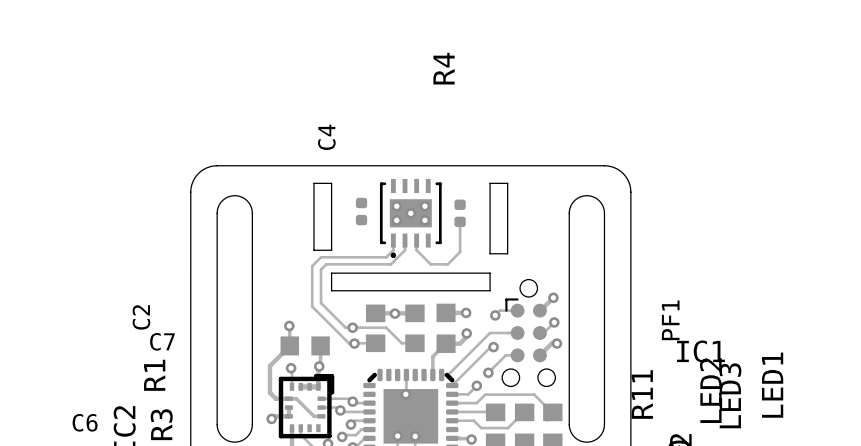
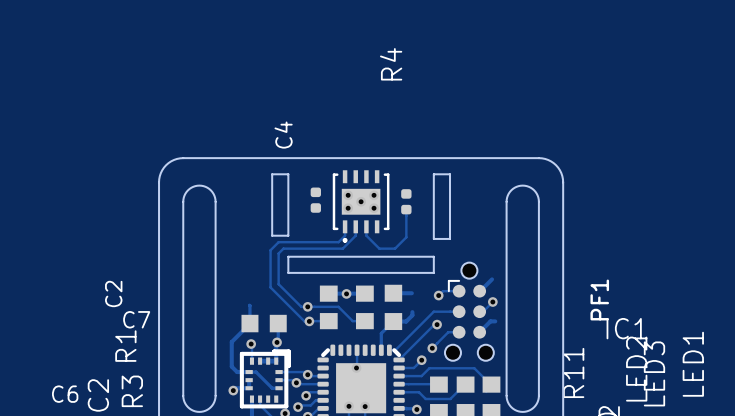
via: (553, 297) -> none
via: (466, 312) -> none
via: (289, 325) -> none
via: (466, 333) -> none
via: (556, 343) -> none

